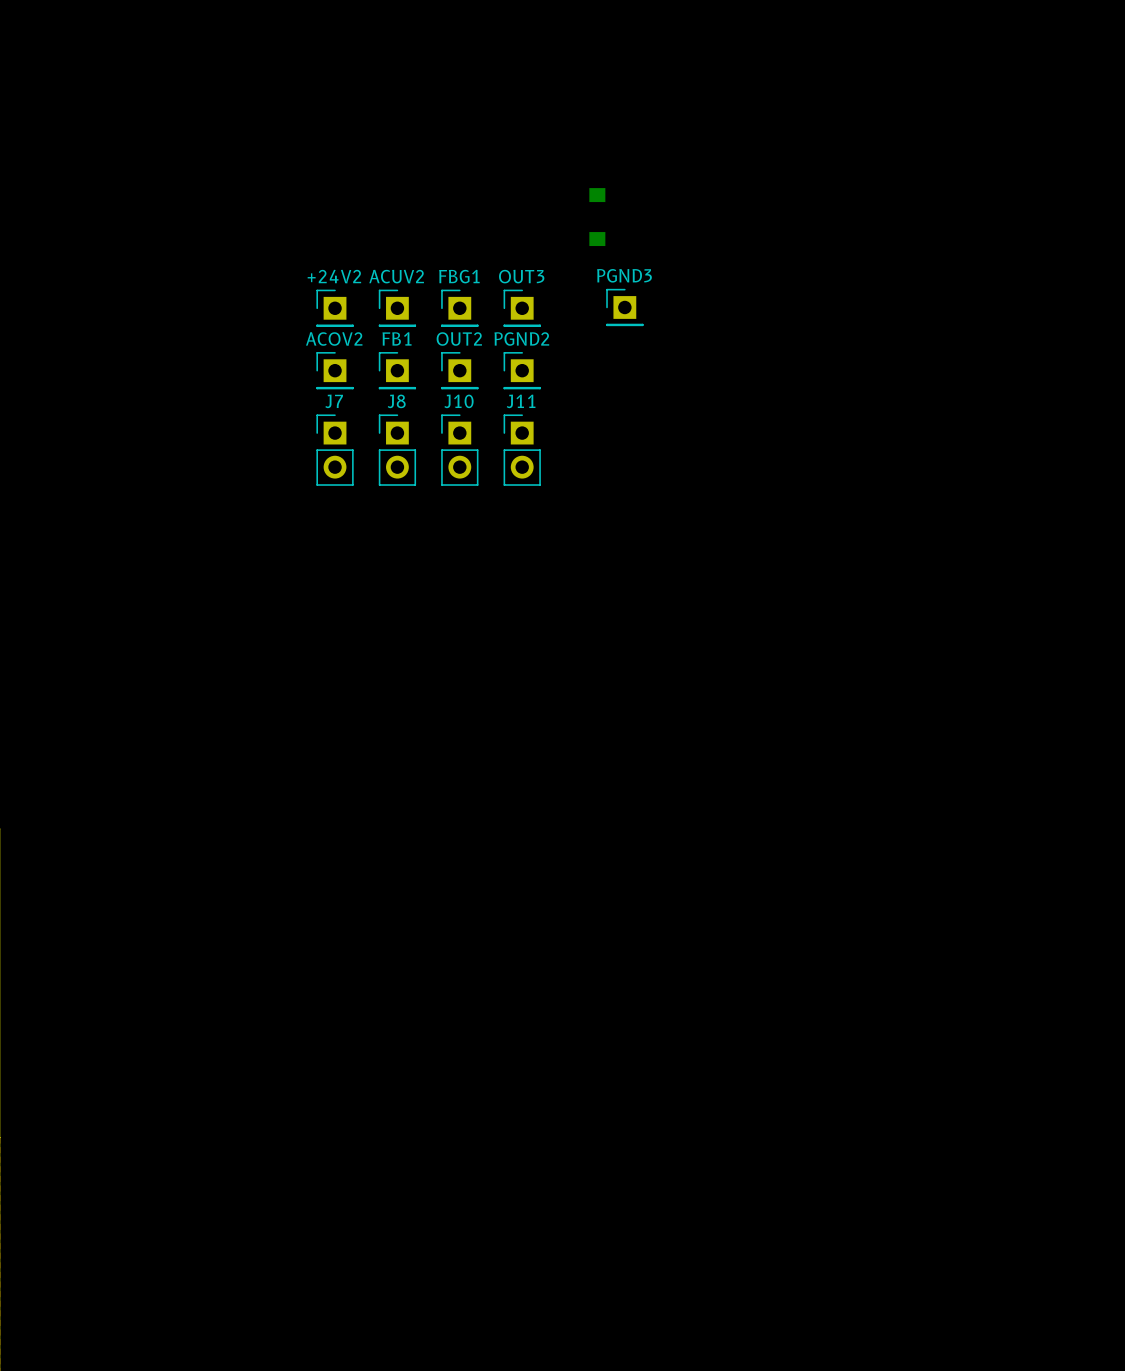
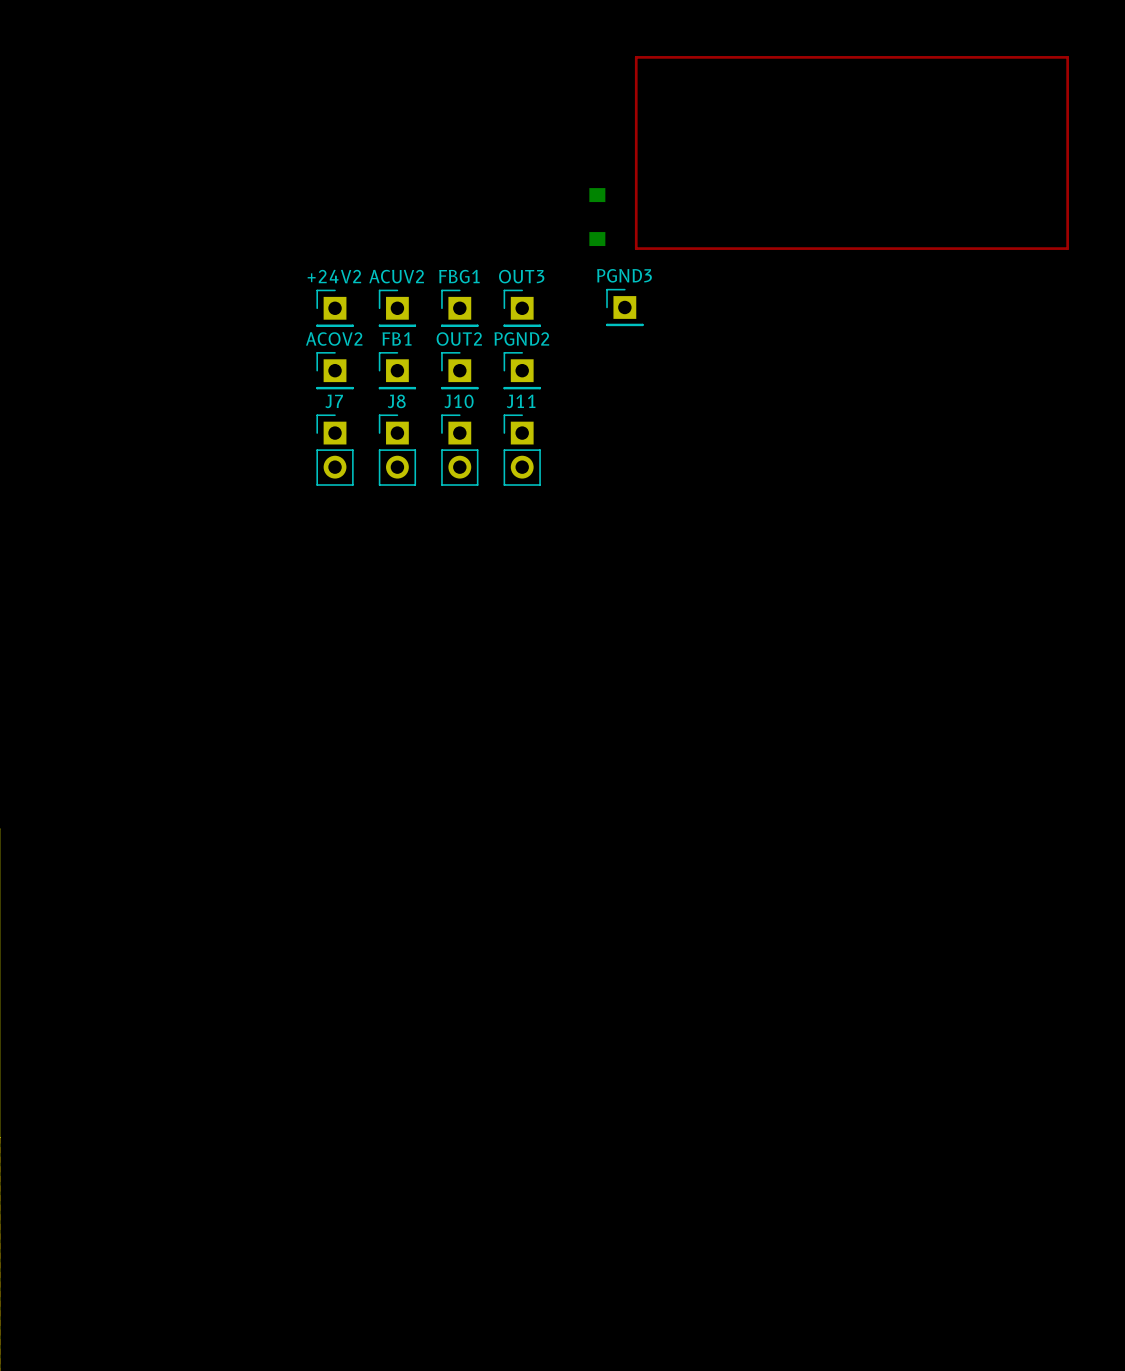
top track: none -> (636, 57) (1067, 57) (1067, 248) (636, 248) (636, 57)

